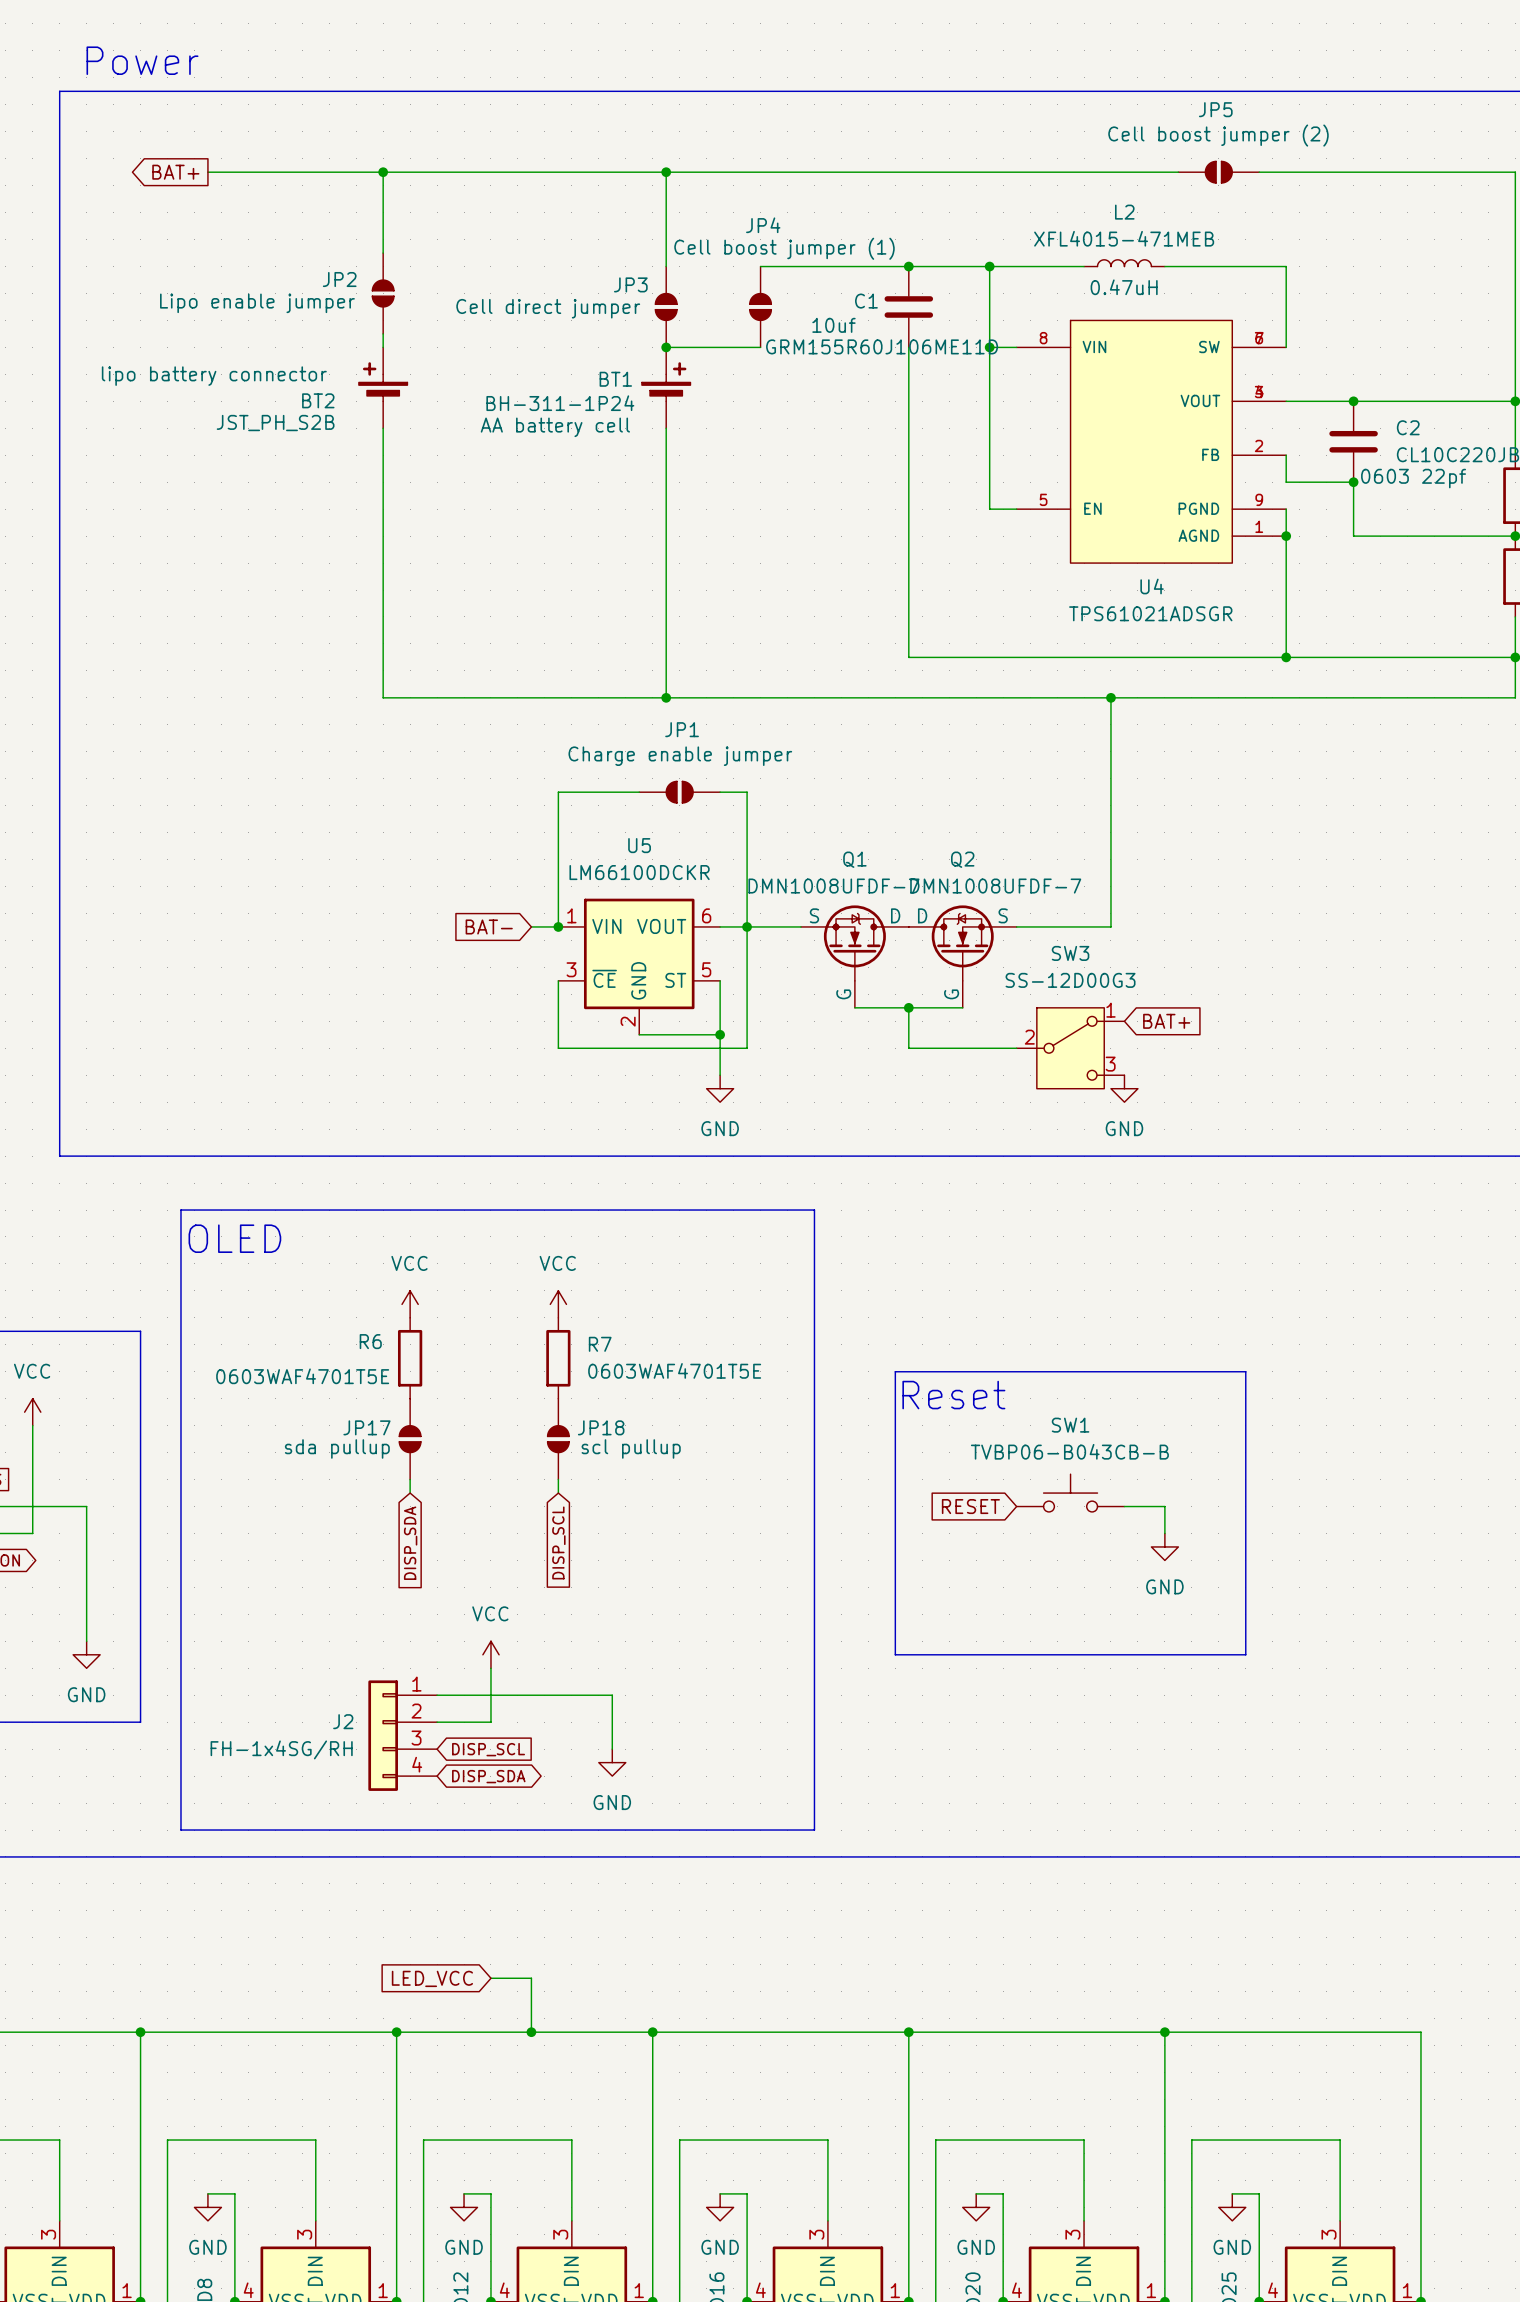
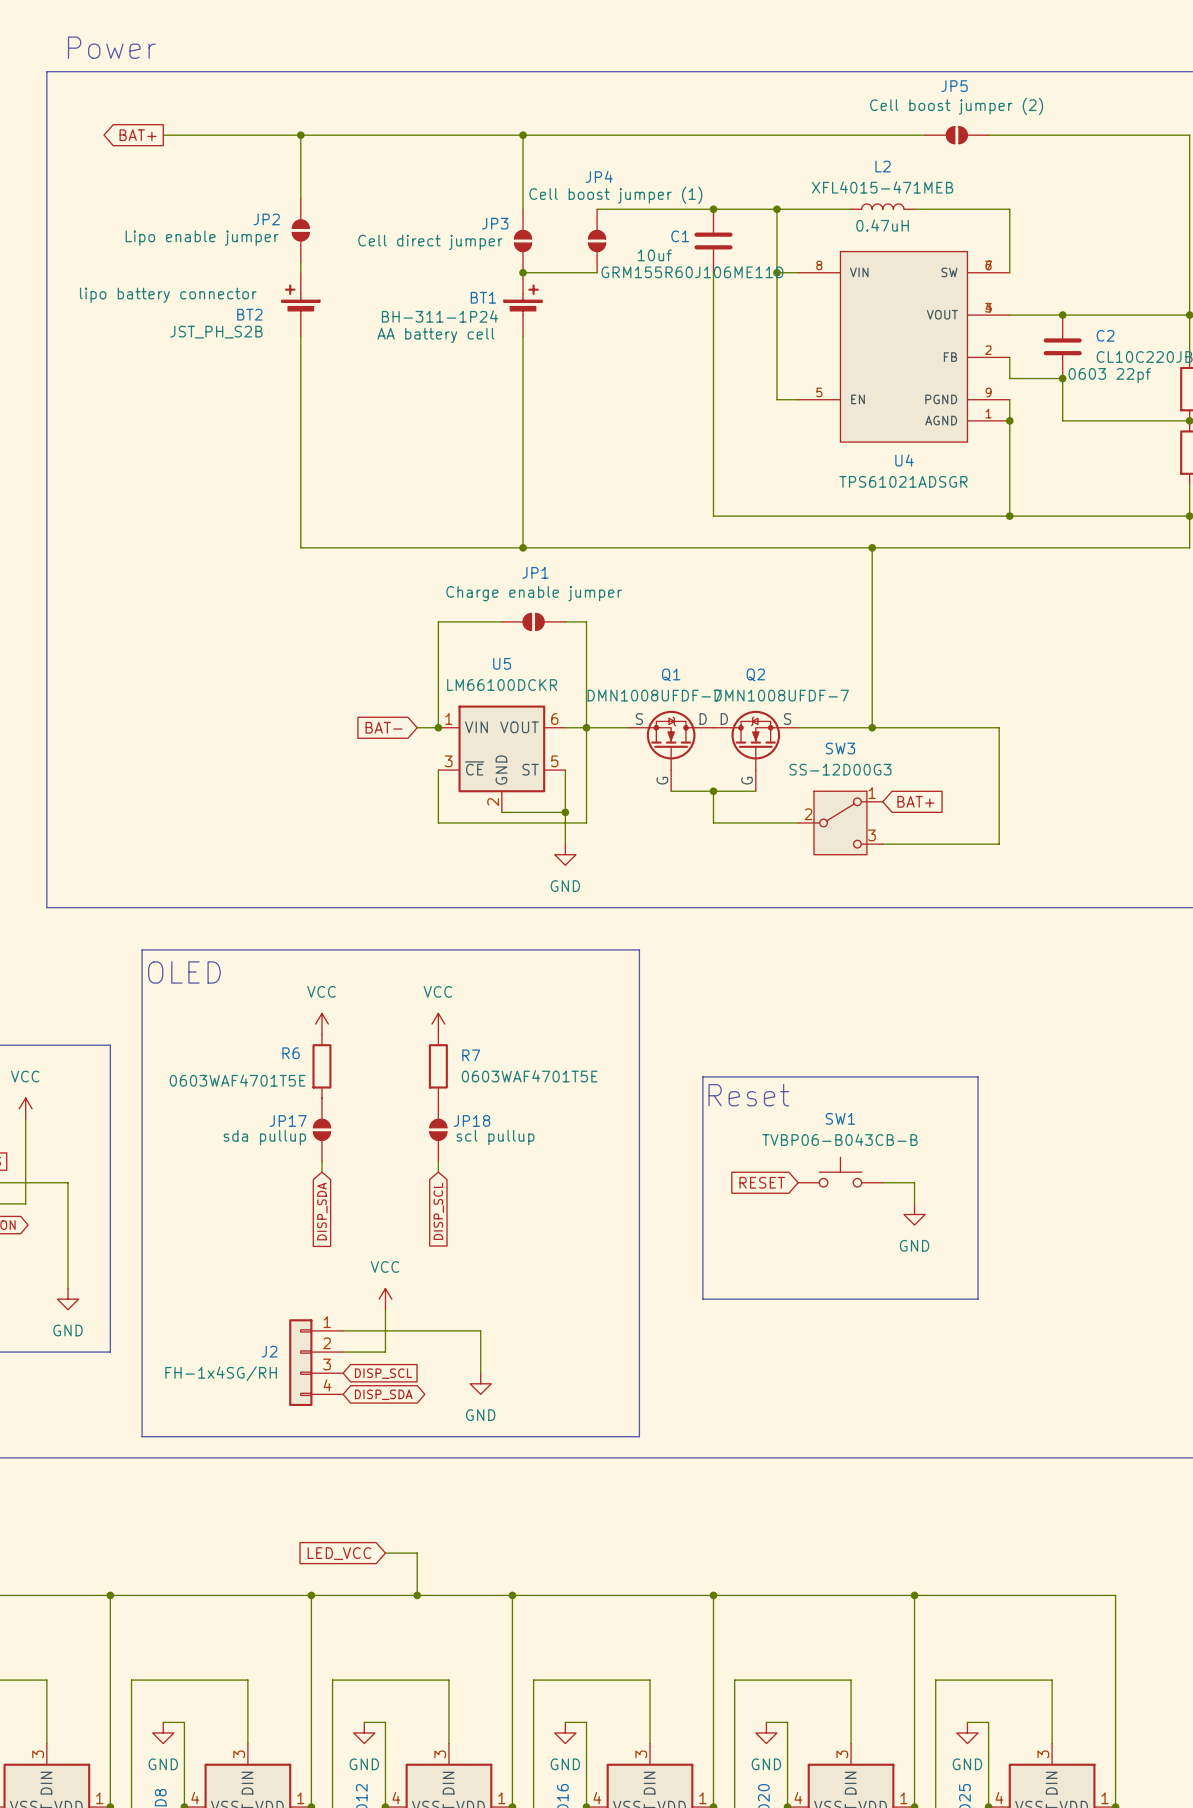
wire: none -> (872, 727) (999, 727) (999, 844) (882, 844)
junction: none -> (872, 727)
power symbol: GND (1124, 1088) -> none

